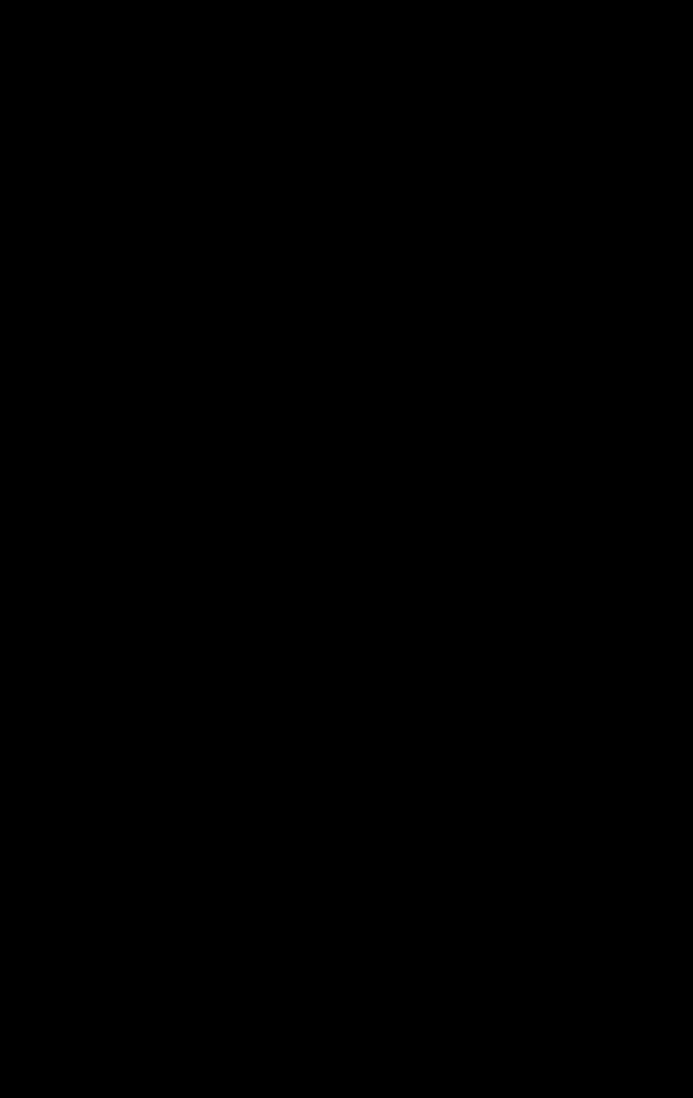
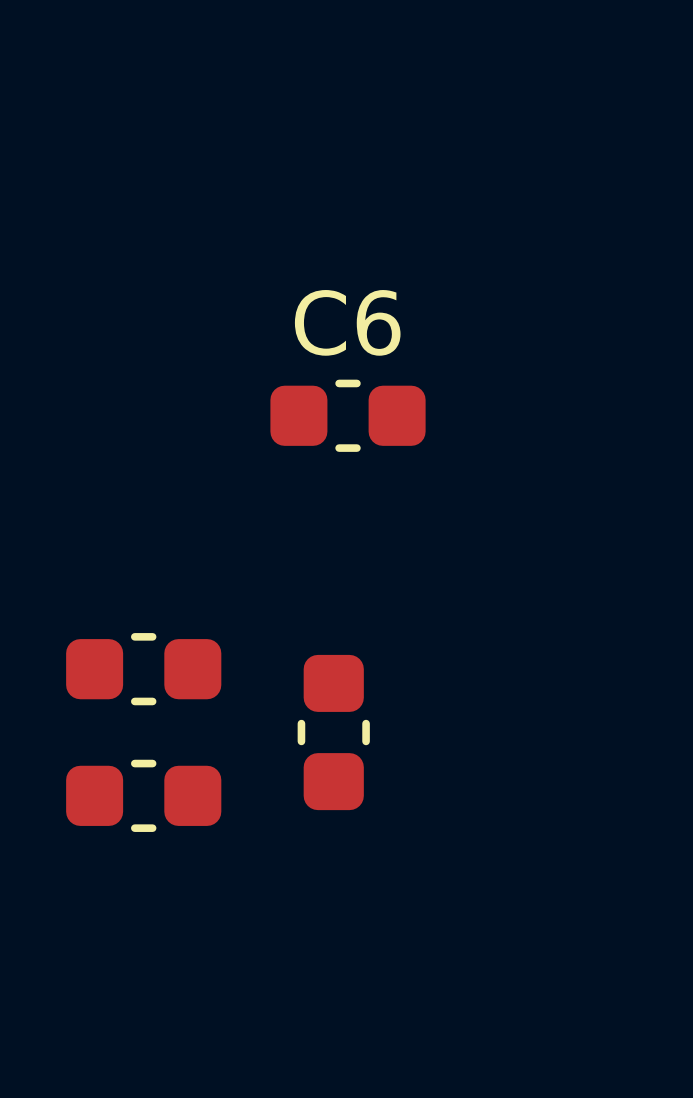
C6: none -> (348, 415)
part: none -> (143, 669)
part: none -> (333, 732)
part: none -> (143, 795)

